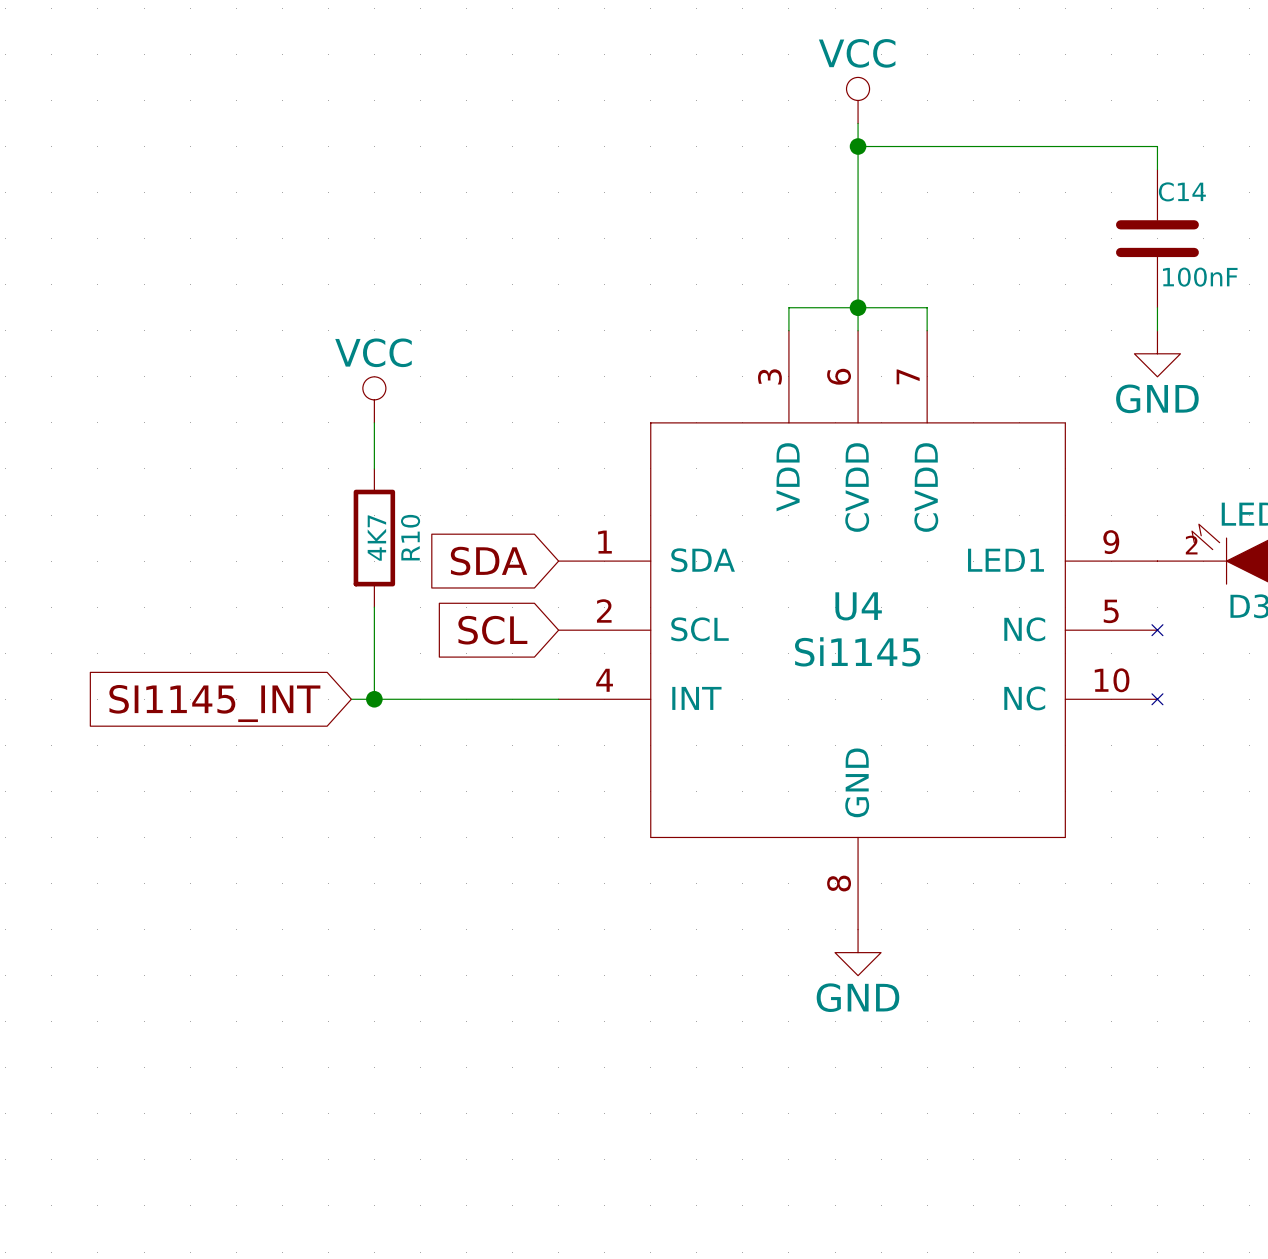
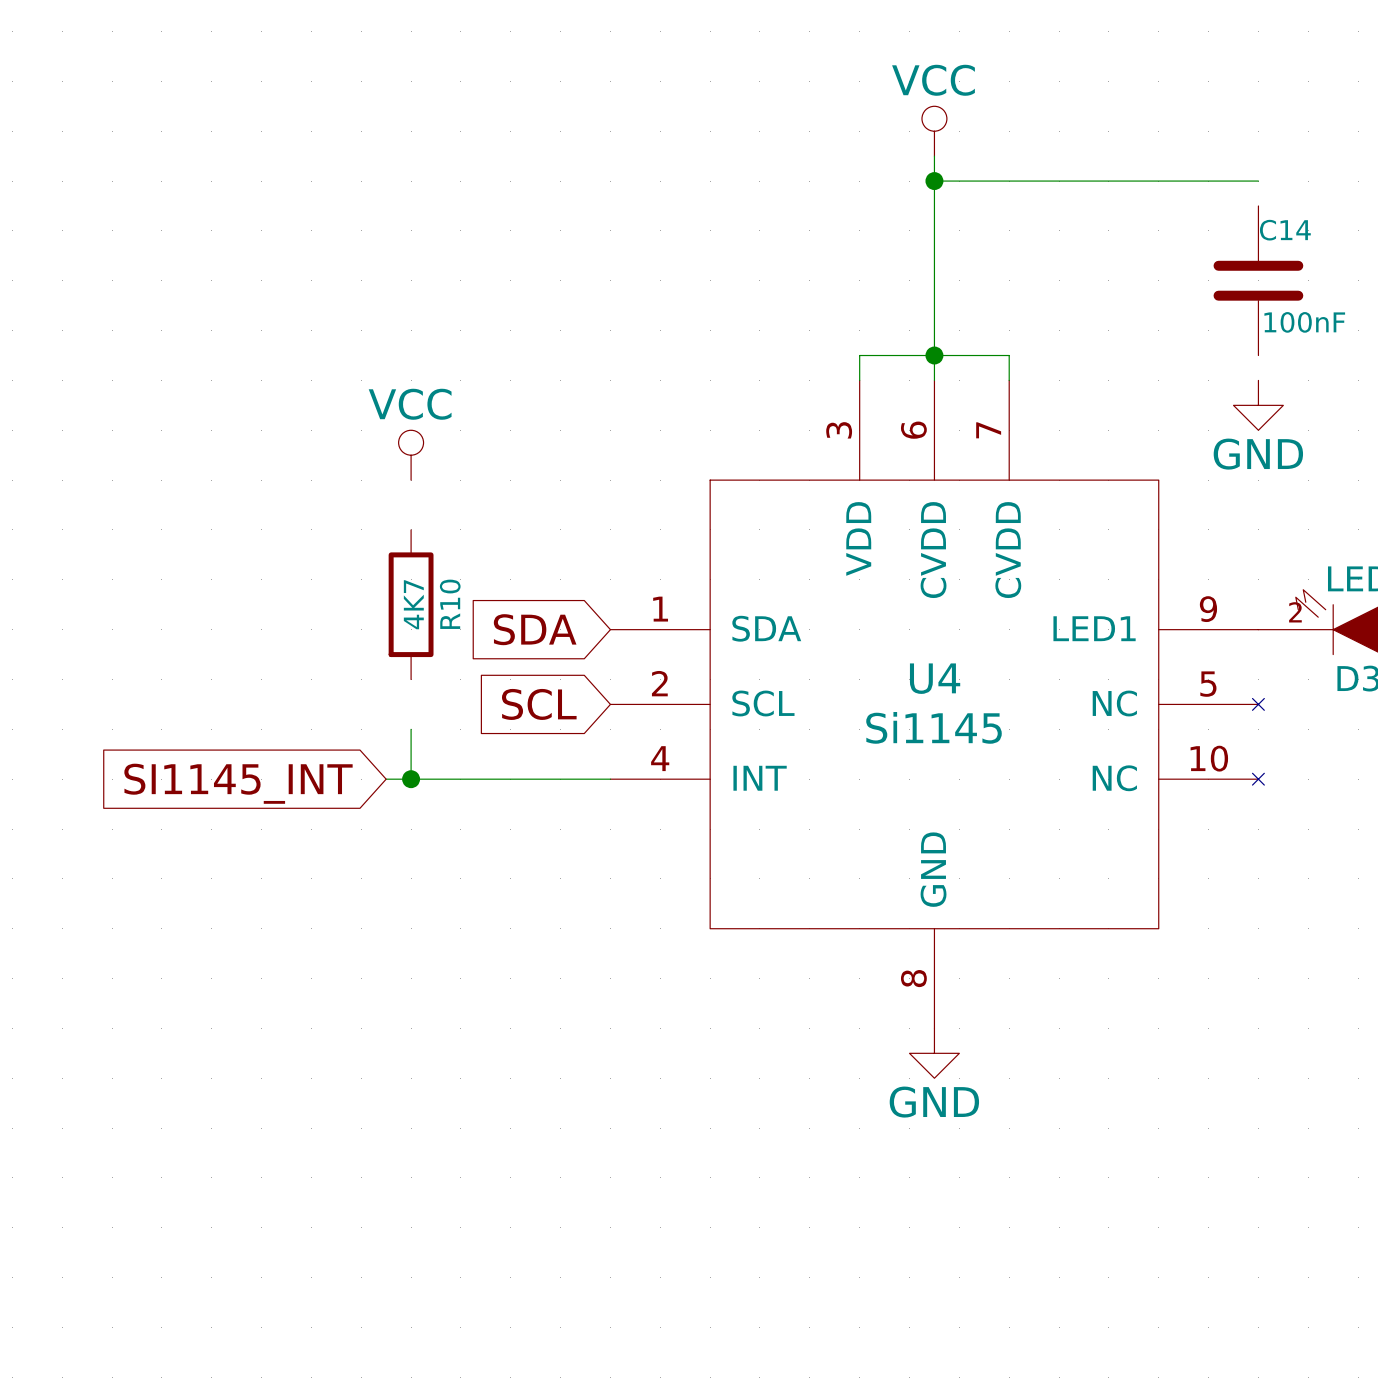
wire: (1157, 146) (1157, 169) -> none
wire: (1157, 307) (1157, 330) -> none
wire: (374, 422) (374, 468) -> none
wire: (374, 607) (374, 653) -> none

